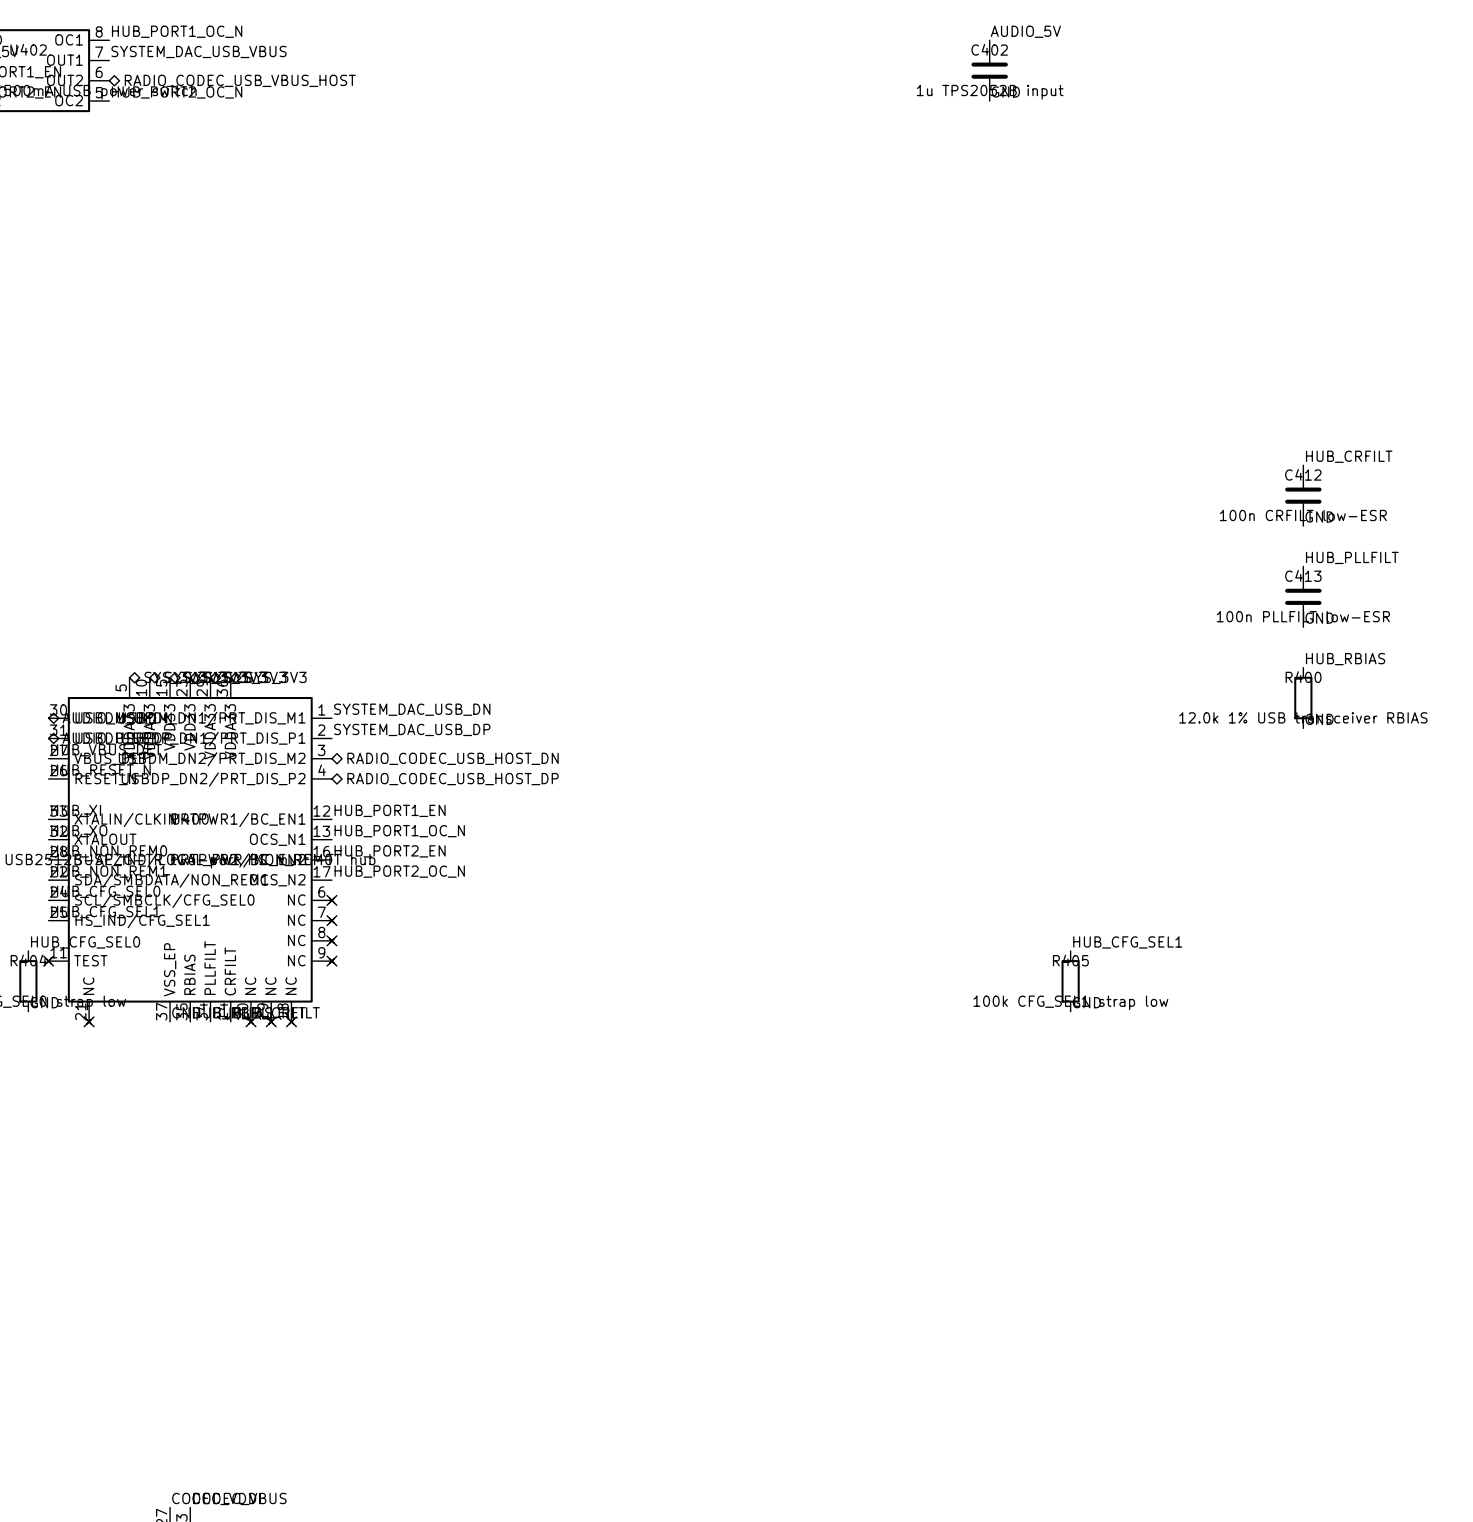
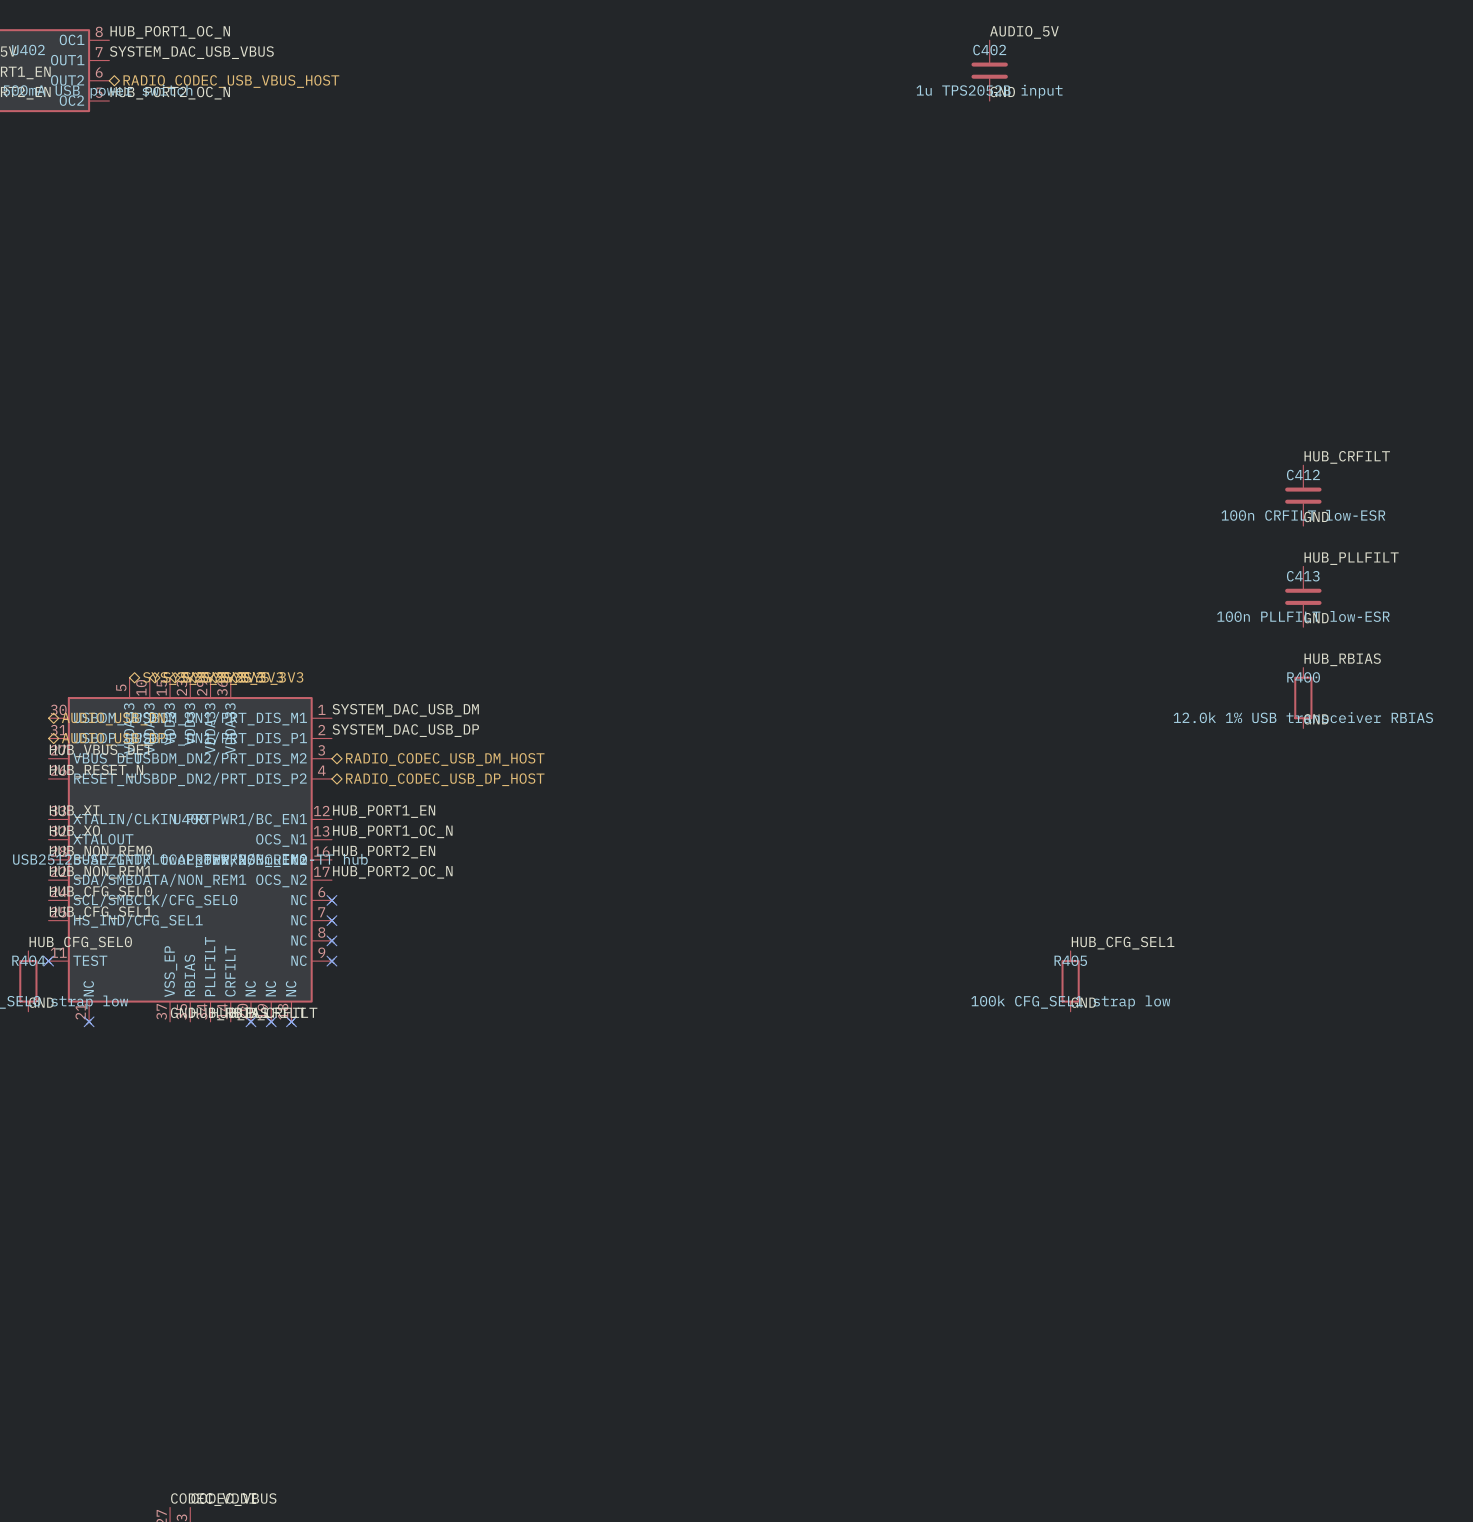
label: SYSTEM_DAC_USB_DN (412, 709) -> SYSTEM_DAC_USB_DM (405, 710)
hierarchical label: RADIO_CODEC_USB_HOST_DN (453, 758) -> RADIO_CODEC_USB_DM_HOST (445, 759)
hierarchical label: RADIO_CODEC_USB_HOST_DP (453, 779) -> RADIO_CODEC_USB_DP_HOST (445, 779)

